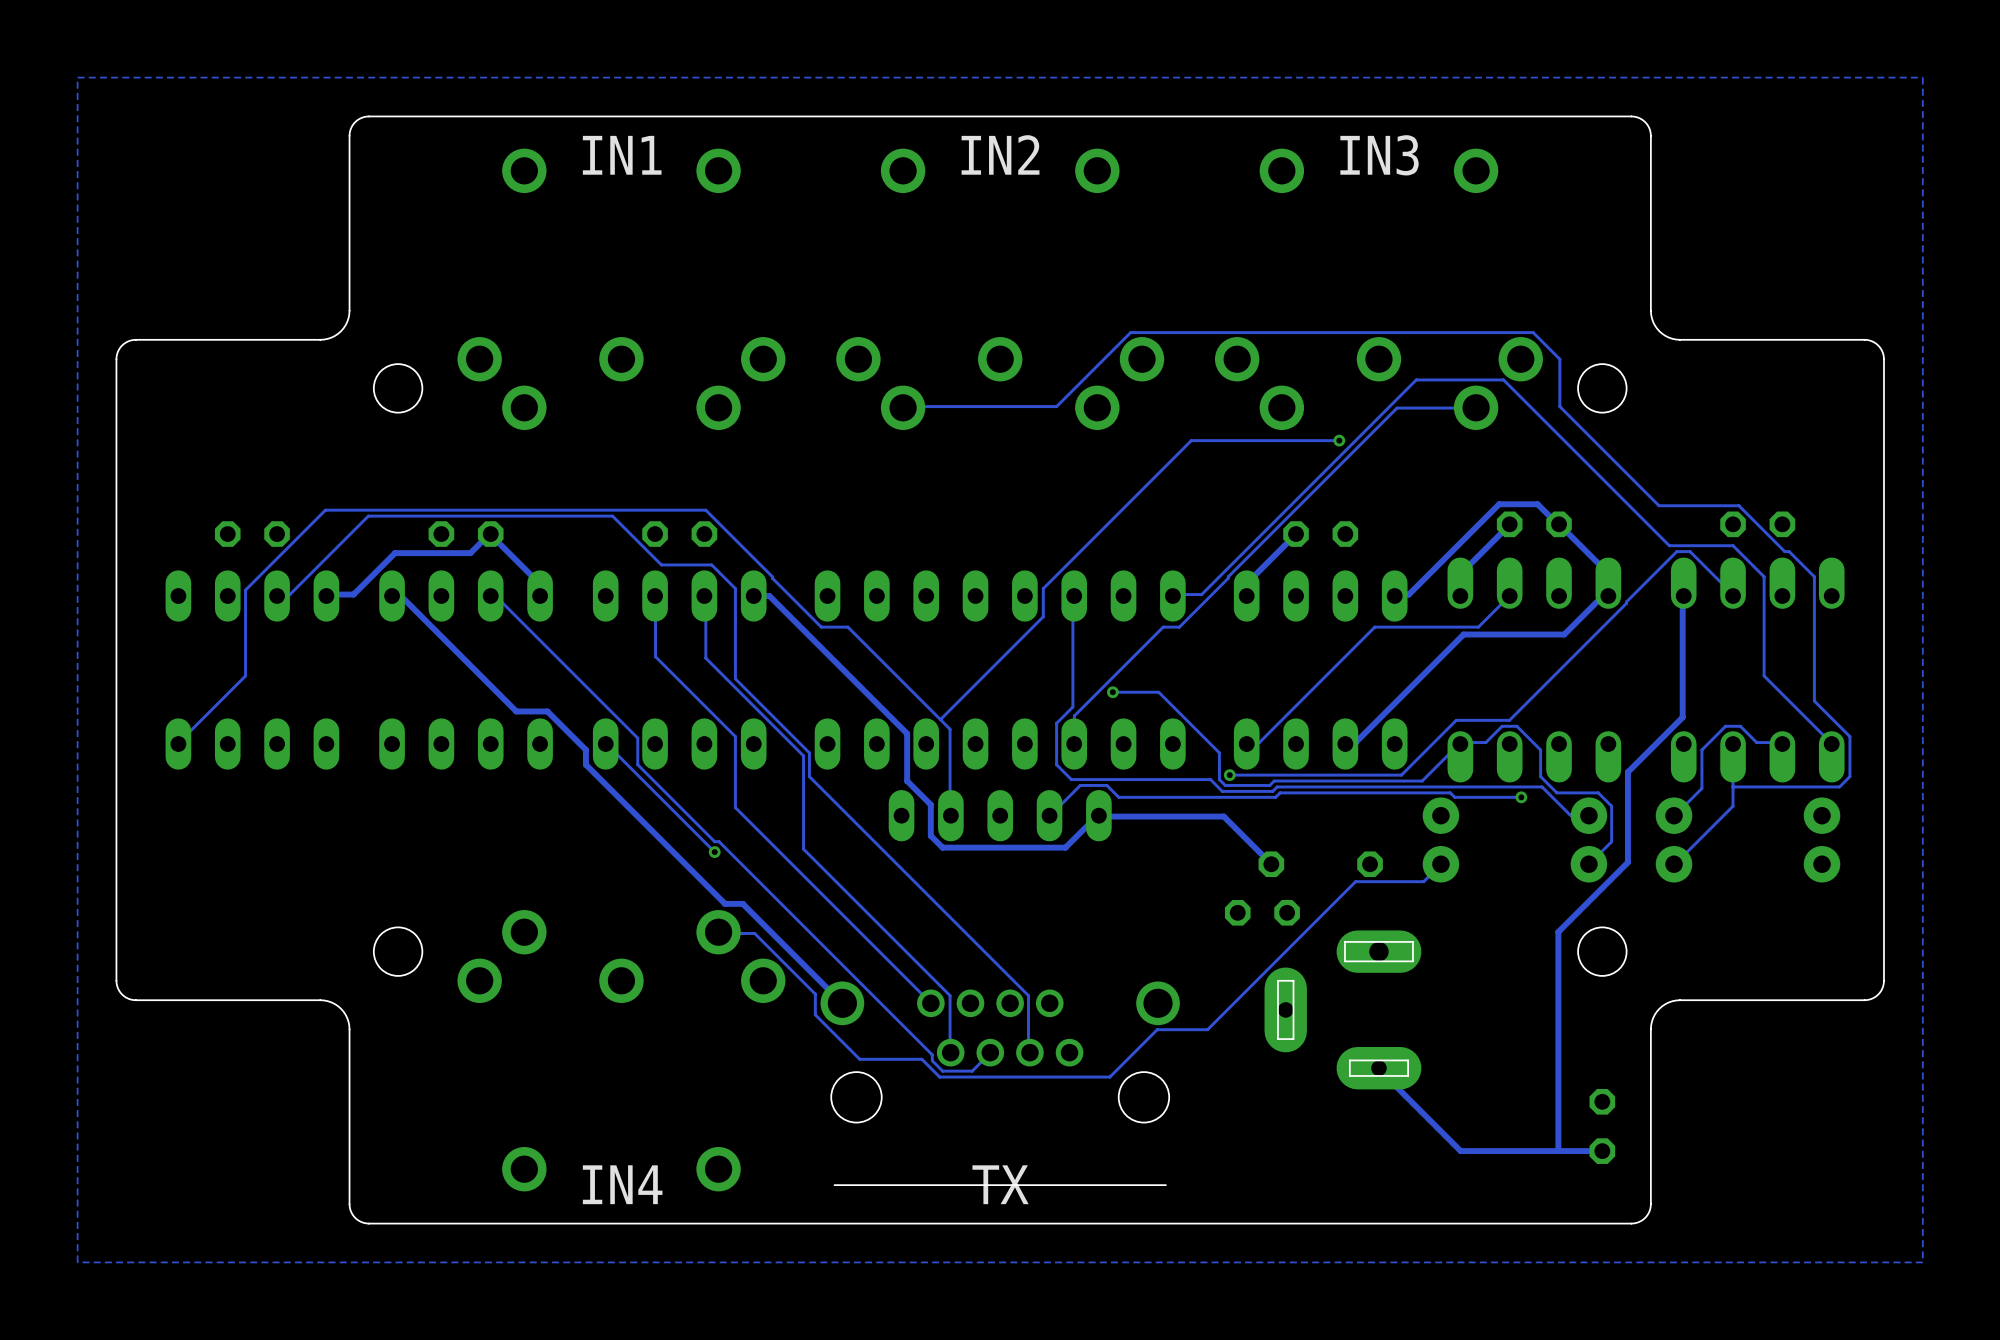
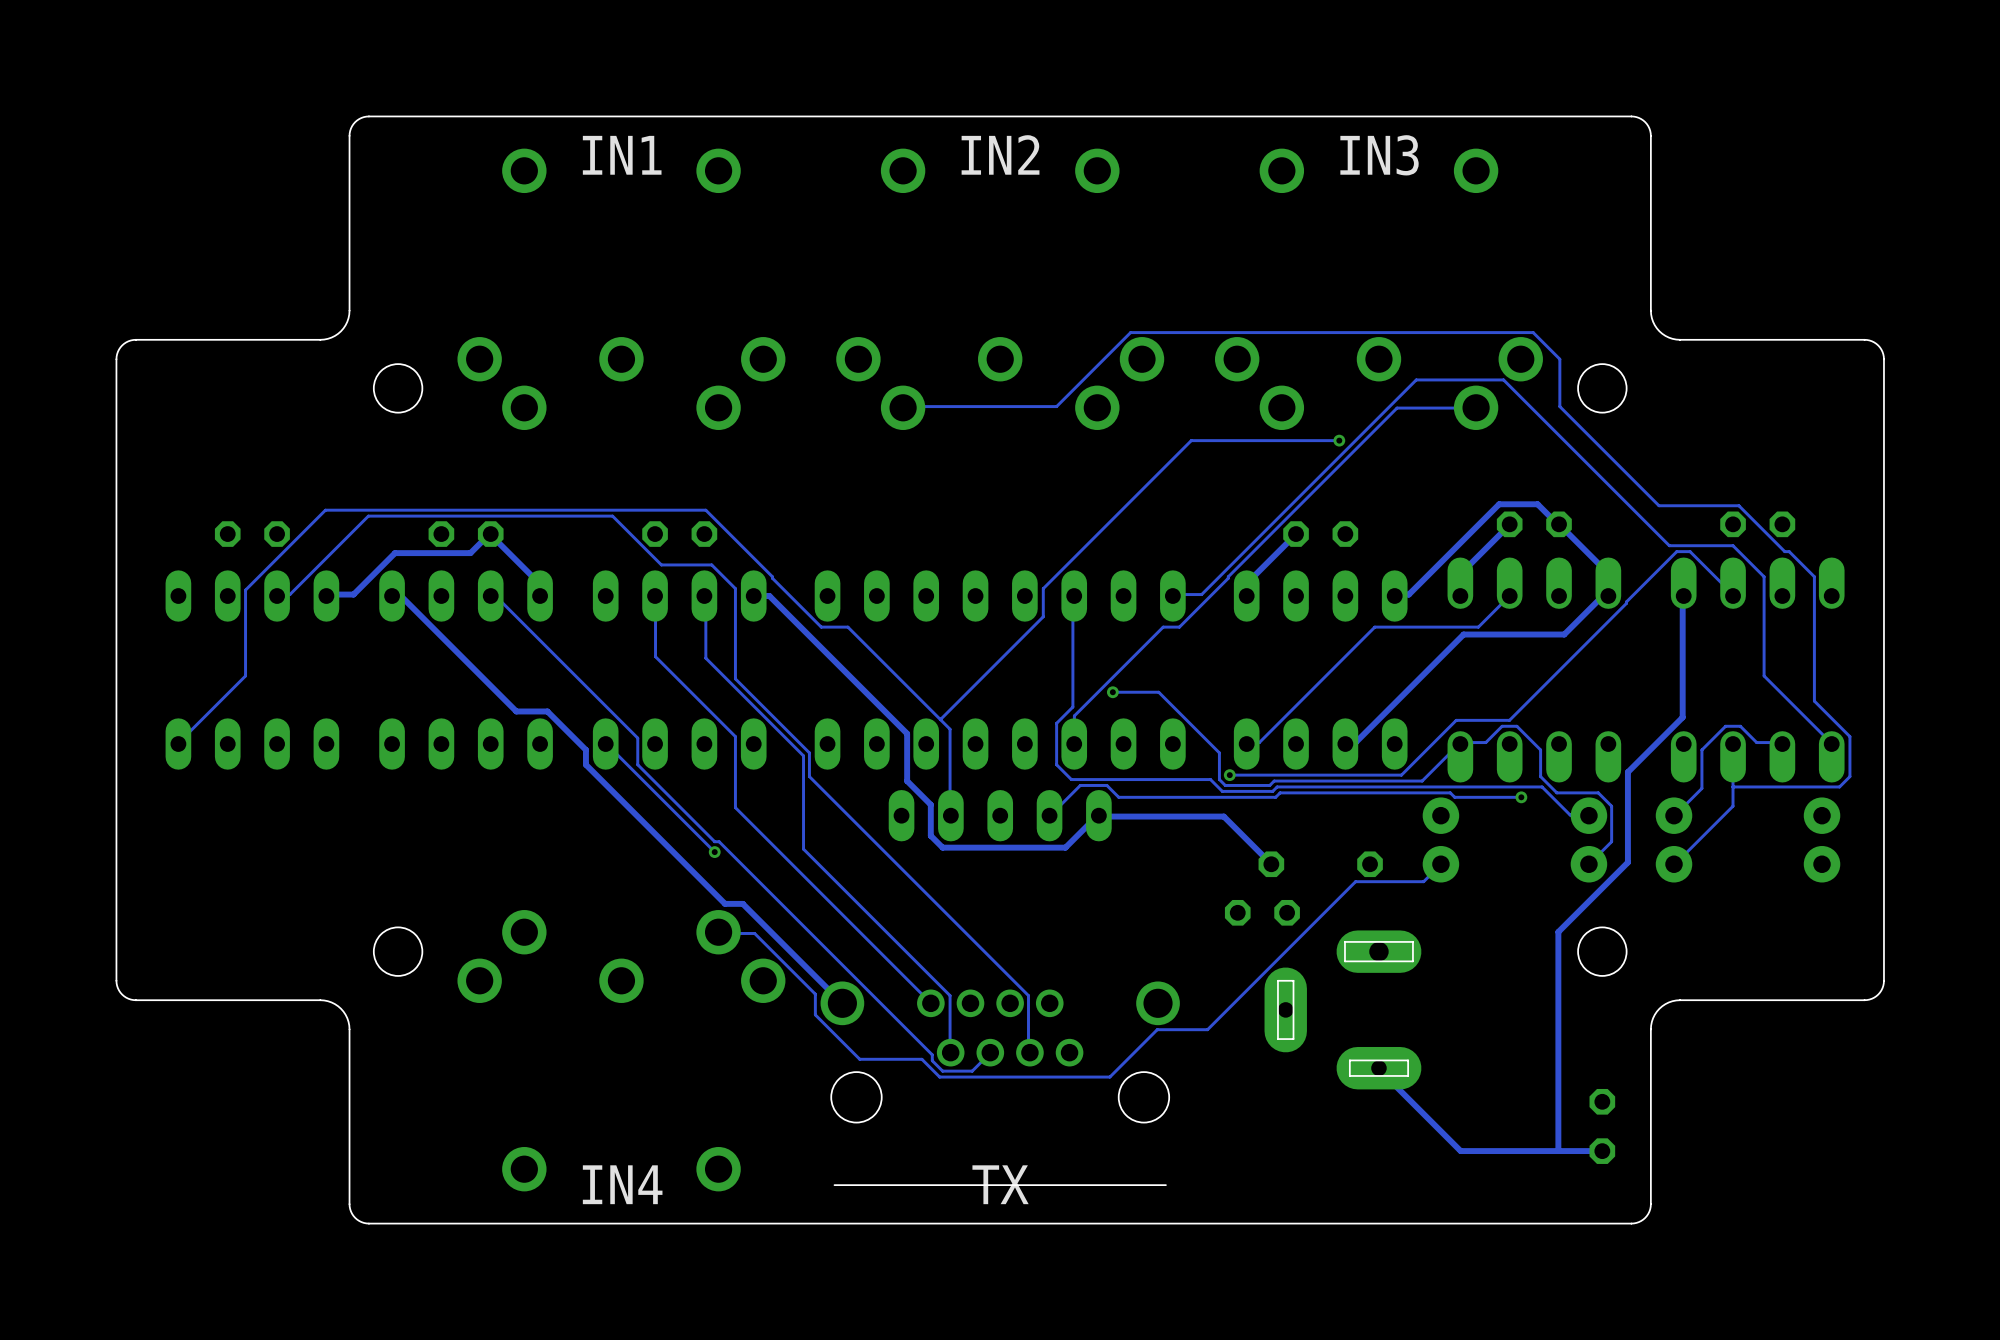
zone outline: (1922, 77) (77, 77) (77, 1262) (1922, 1262) (1922, 77) -> none

